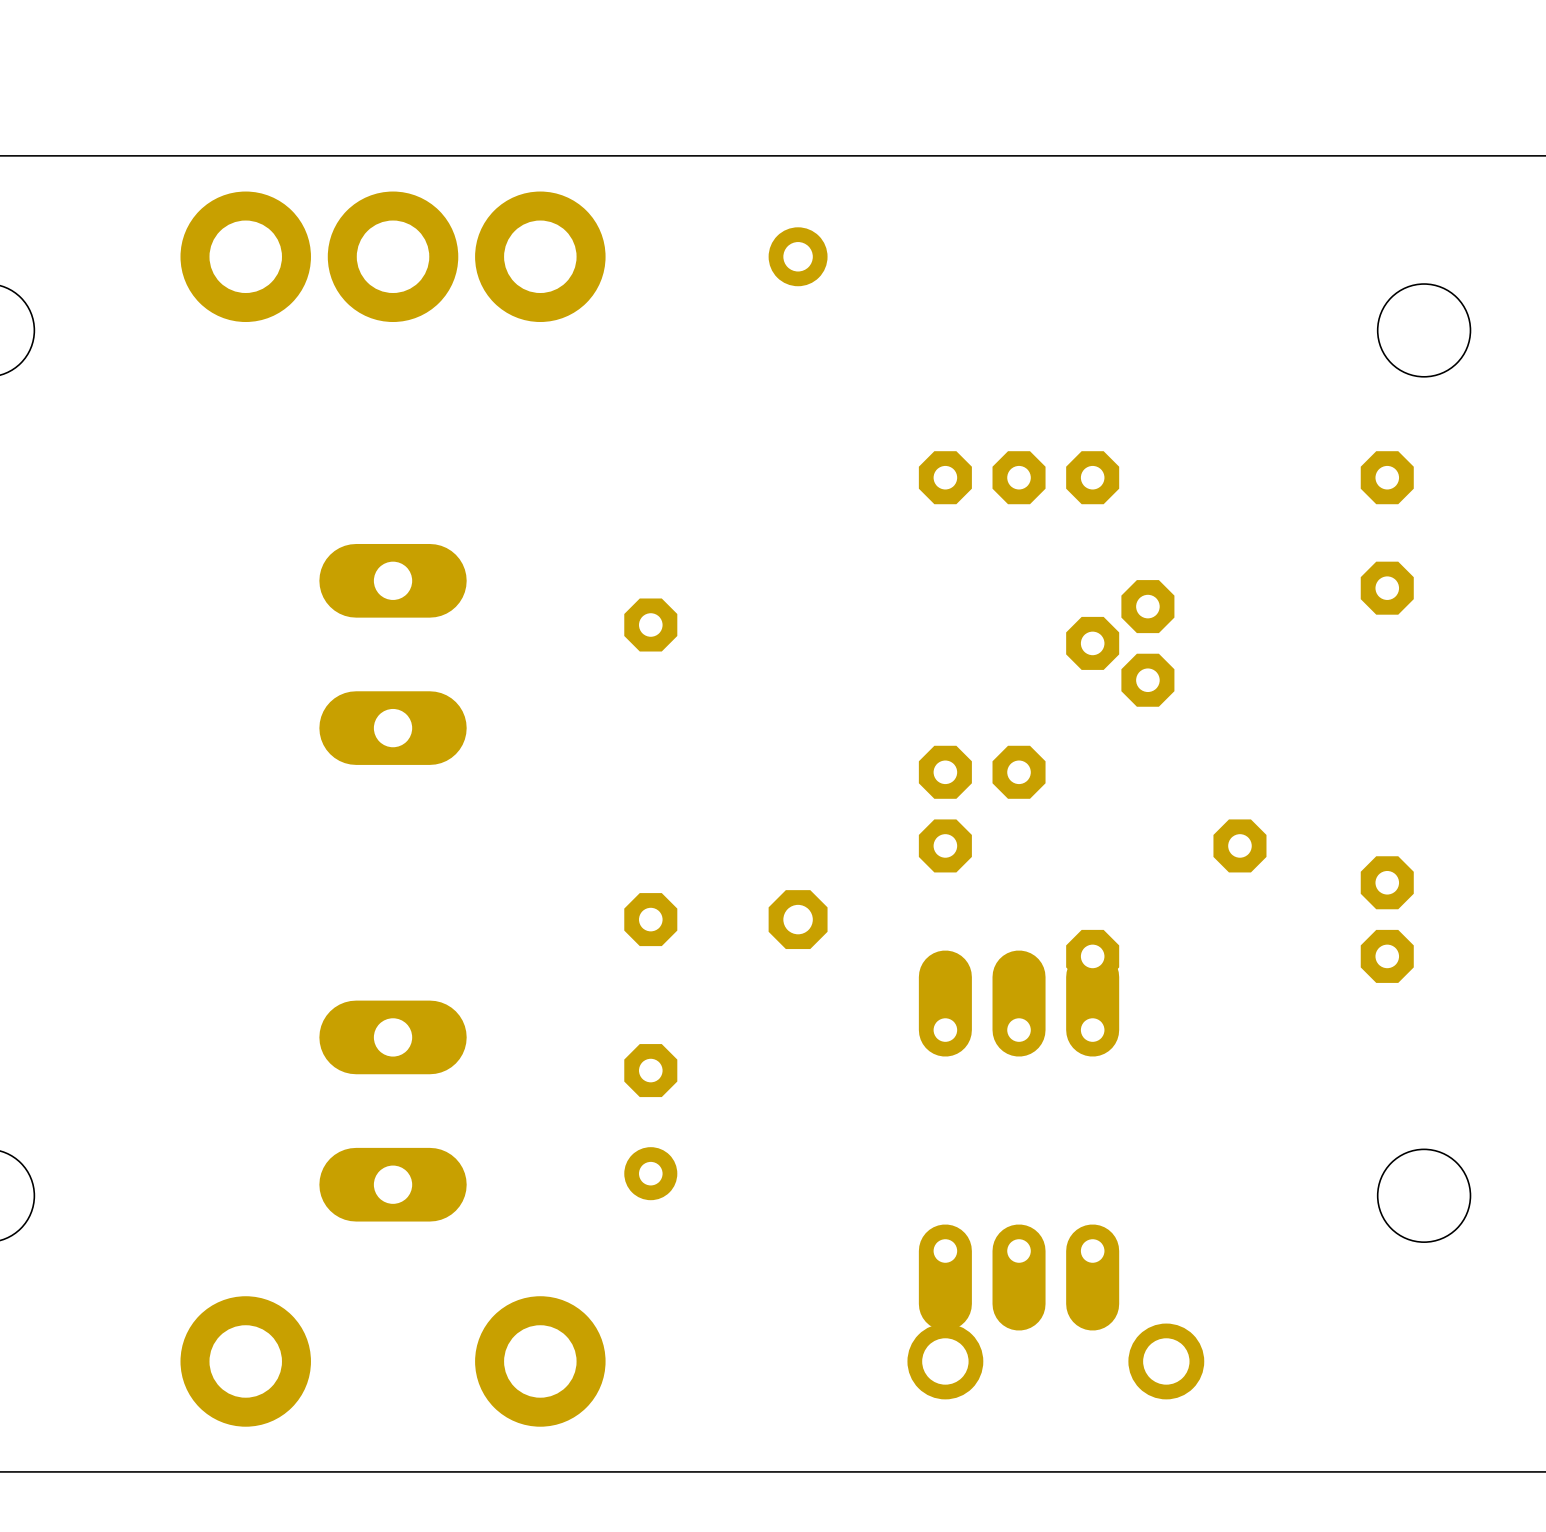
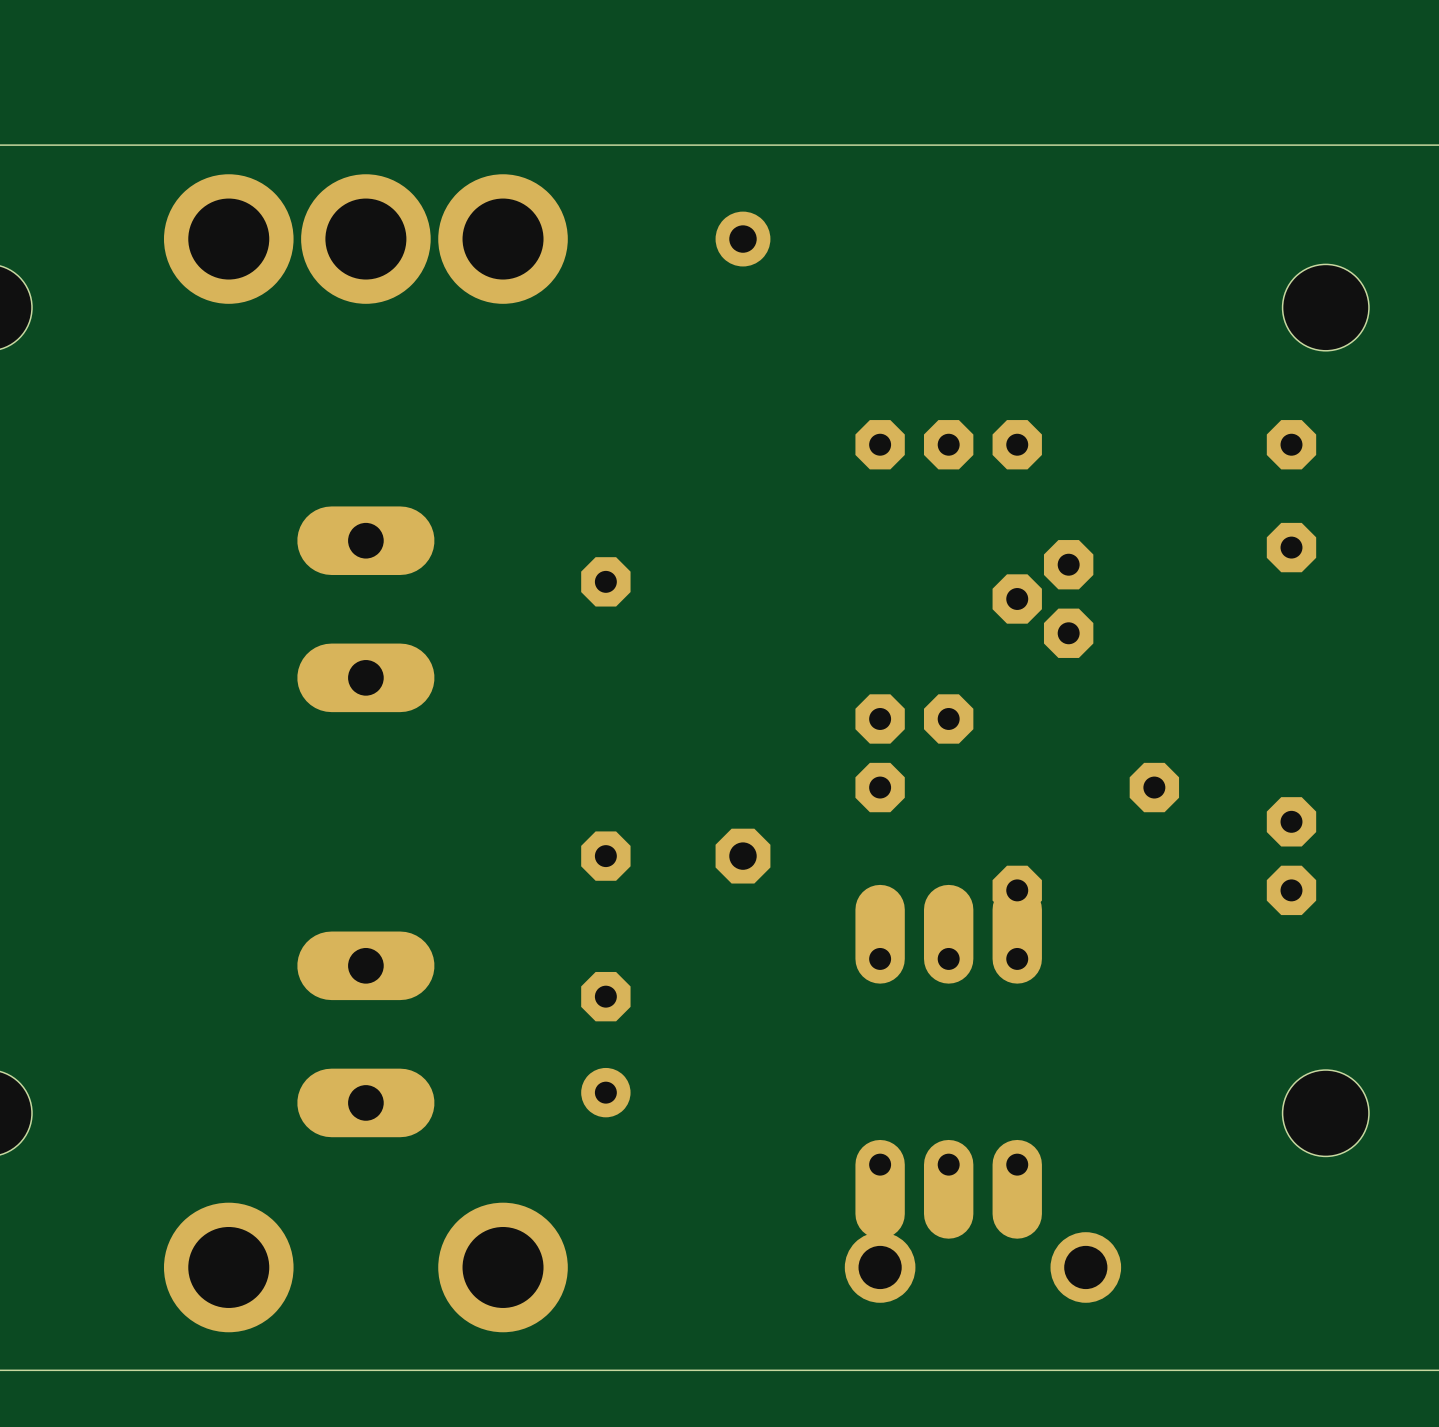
part footprint: [180, 191, 311, 323] -> [163, 174, 294, 304]
part footprint: [327, 191, 459, 323] -> [301, 174, 431, 304]
part footprint: [475, 191, 606, 323] -> [438, 174, 568, 304]
part footprint: [180, 1296, 311, 1427] -> [163, 1202, 294, 1333]
part footprint: [475, 1296, 606, 1427] -> [438, 1202, 568, 1333]

